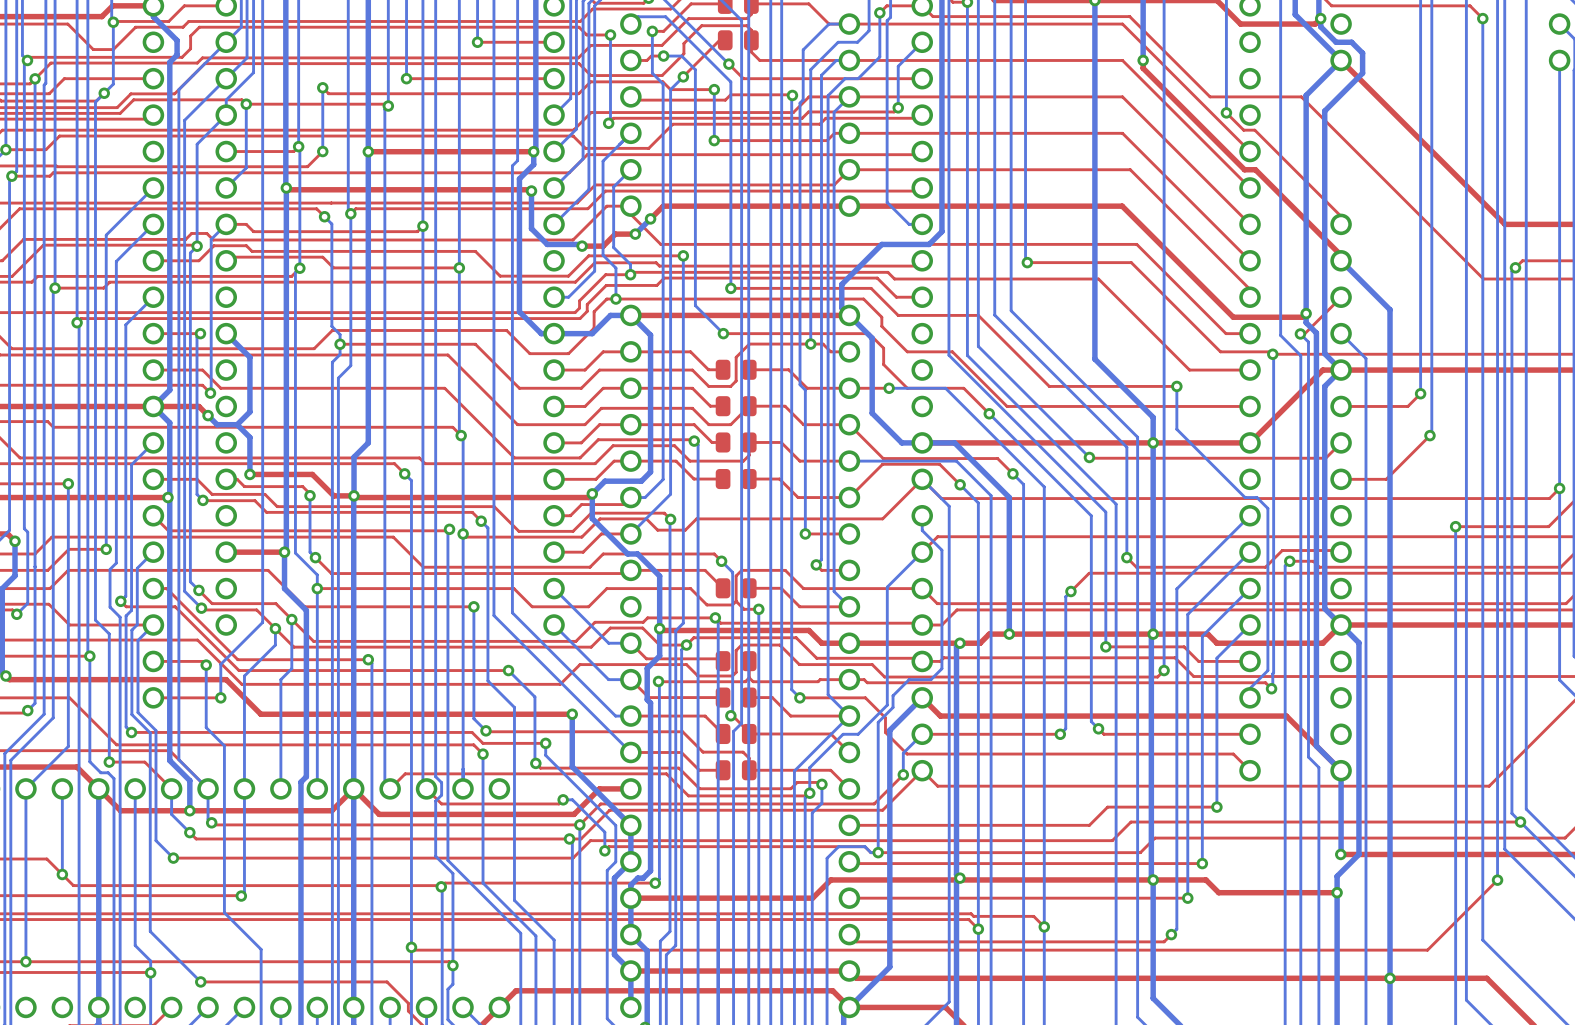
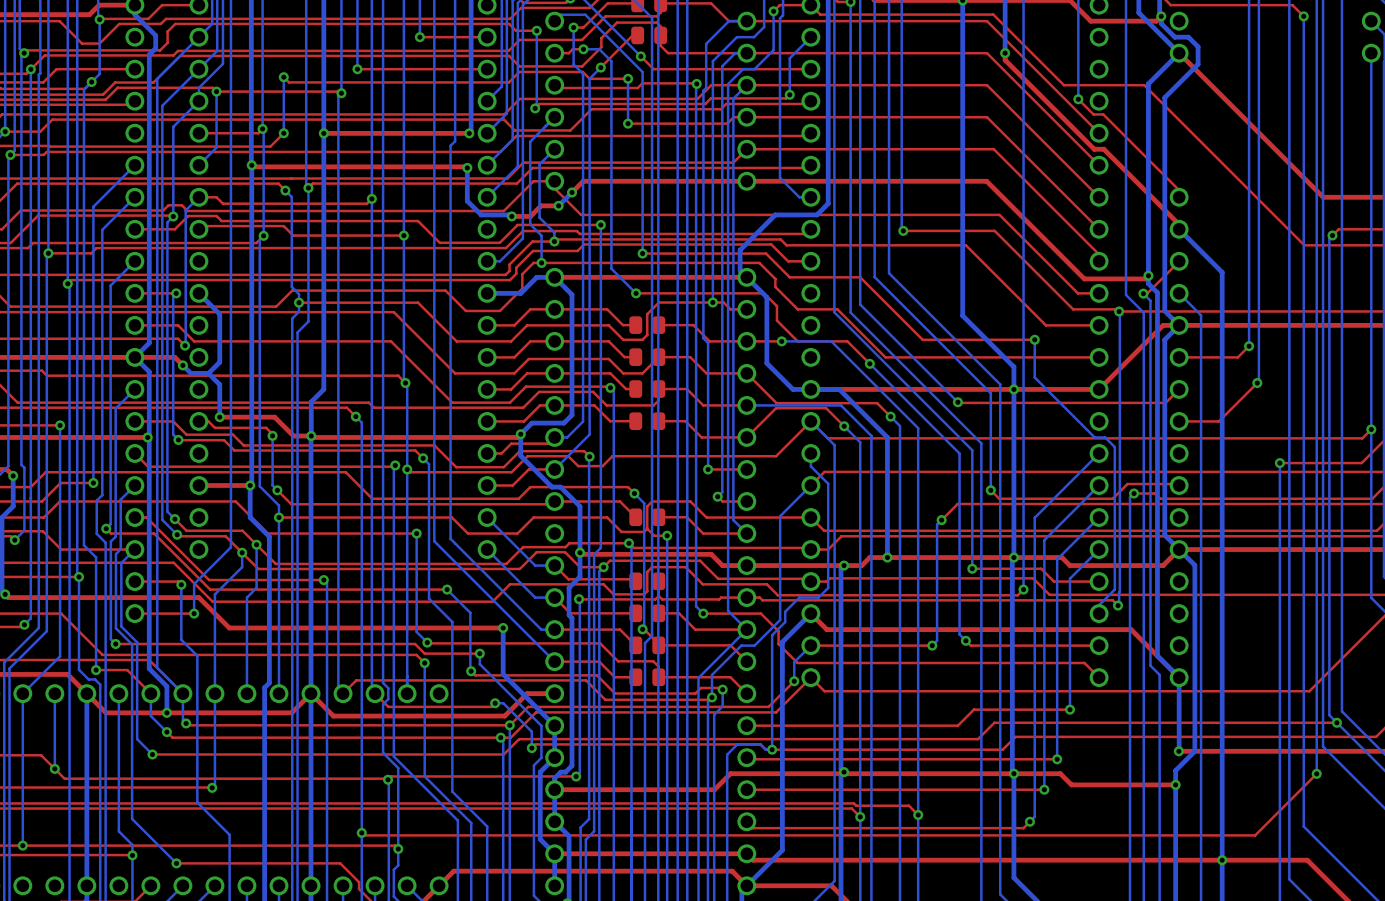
bottom track: (533, 151) (533, 164) (519, 178) (519, 311) (541, 333) (554, 333) -> none

